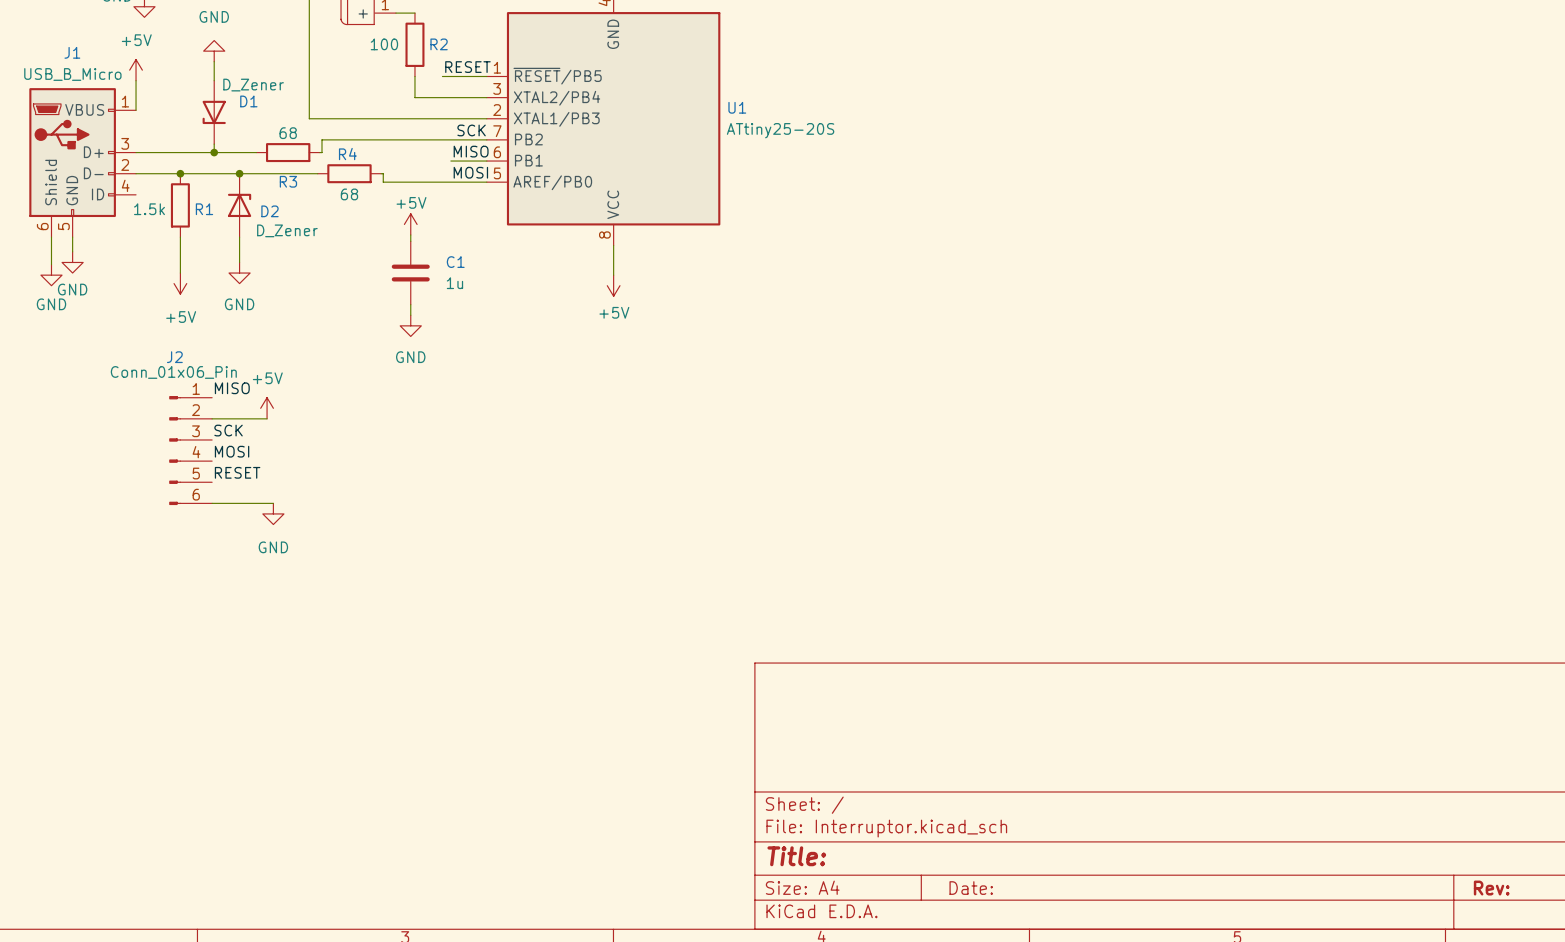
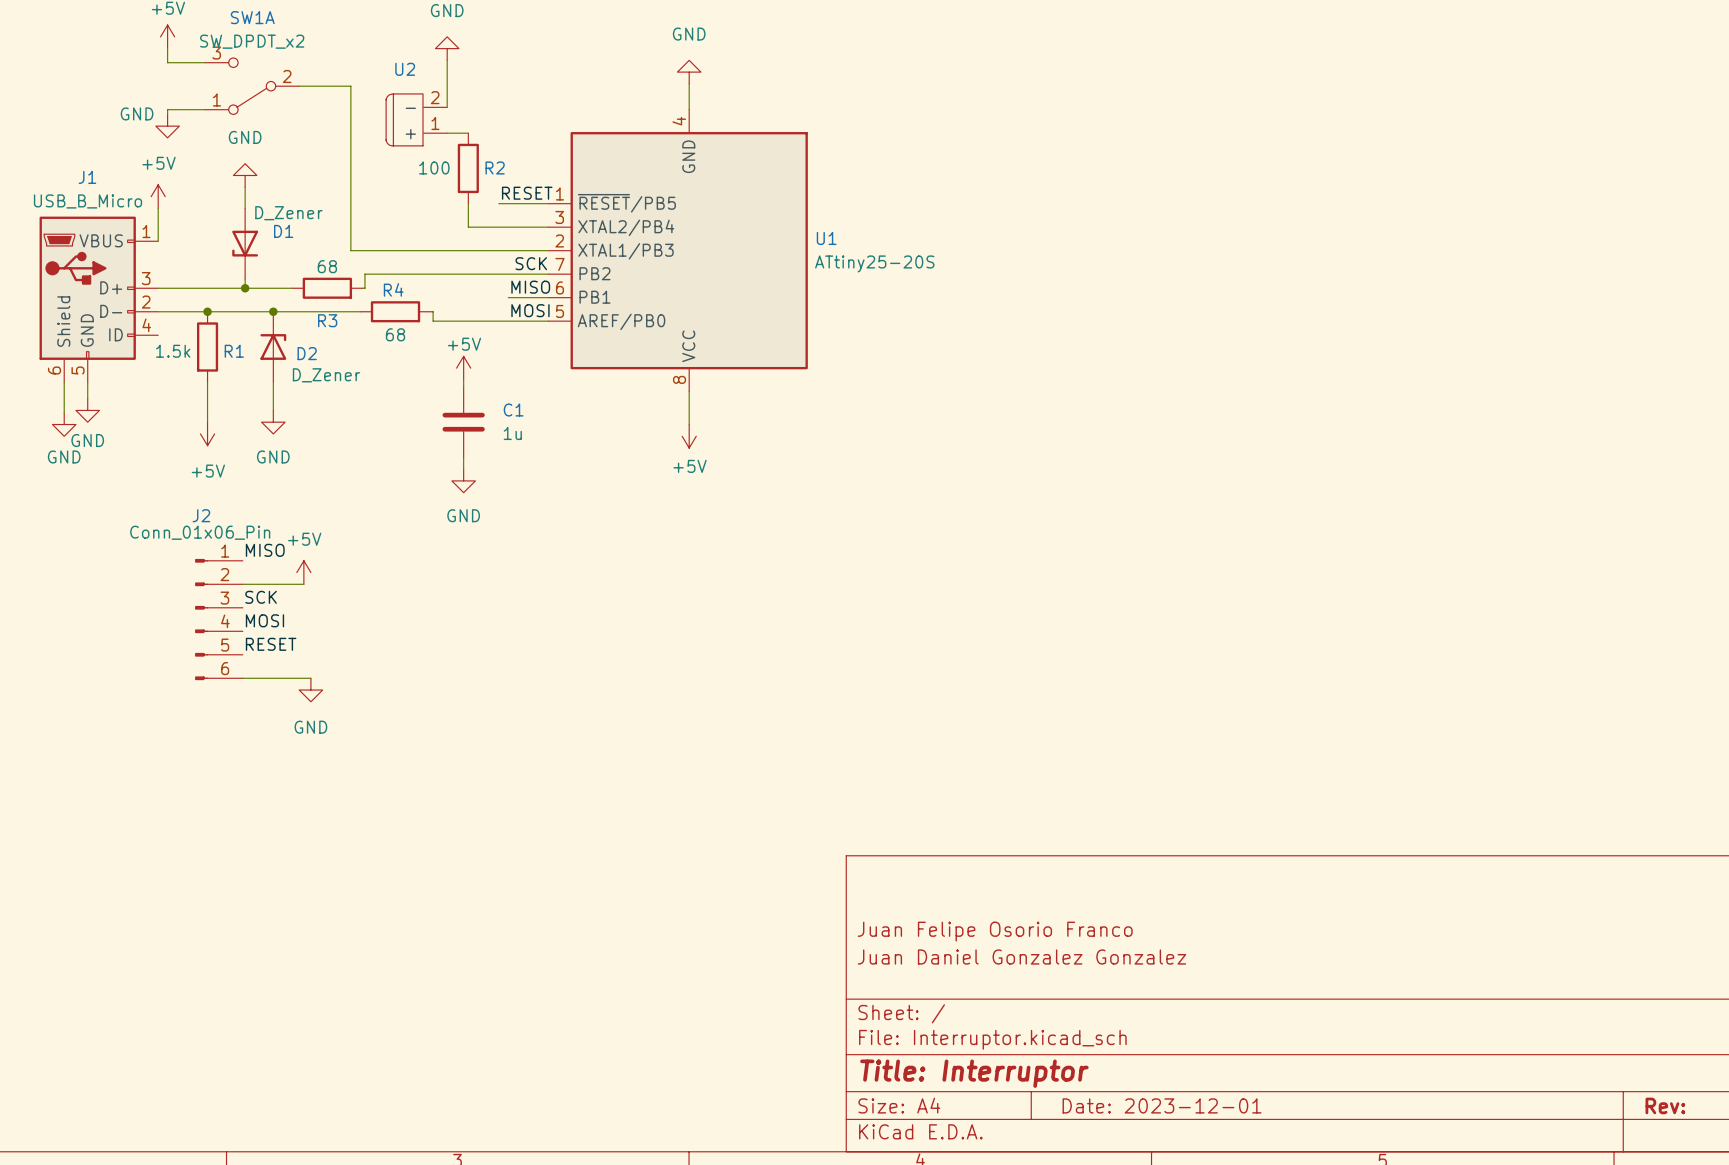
title block: none -> Juan Felipe Osorio Franco (995, 931)
title block: none -> Juan Daniel Gonzalez Gonzalez (1021, 957)
title block: Title: (796, 856) -> Title: Interruptor (974, 1073)
title block: Date: (971, 888) -> Date: 2023-12-01 (1162, 1105)

